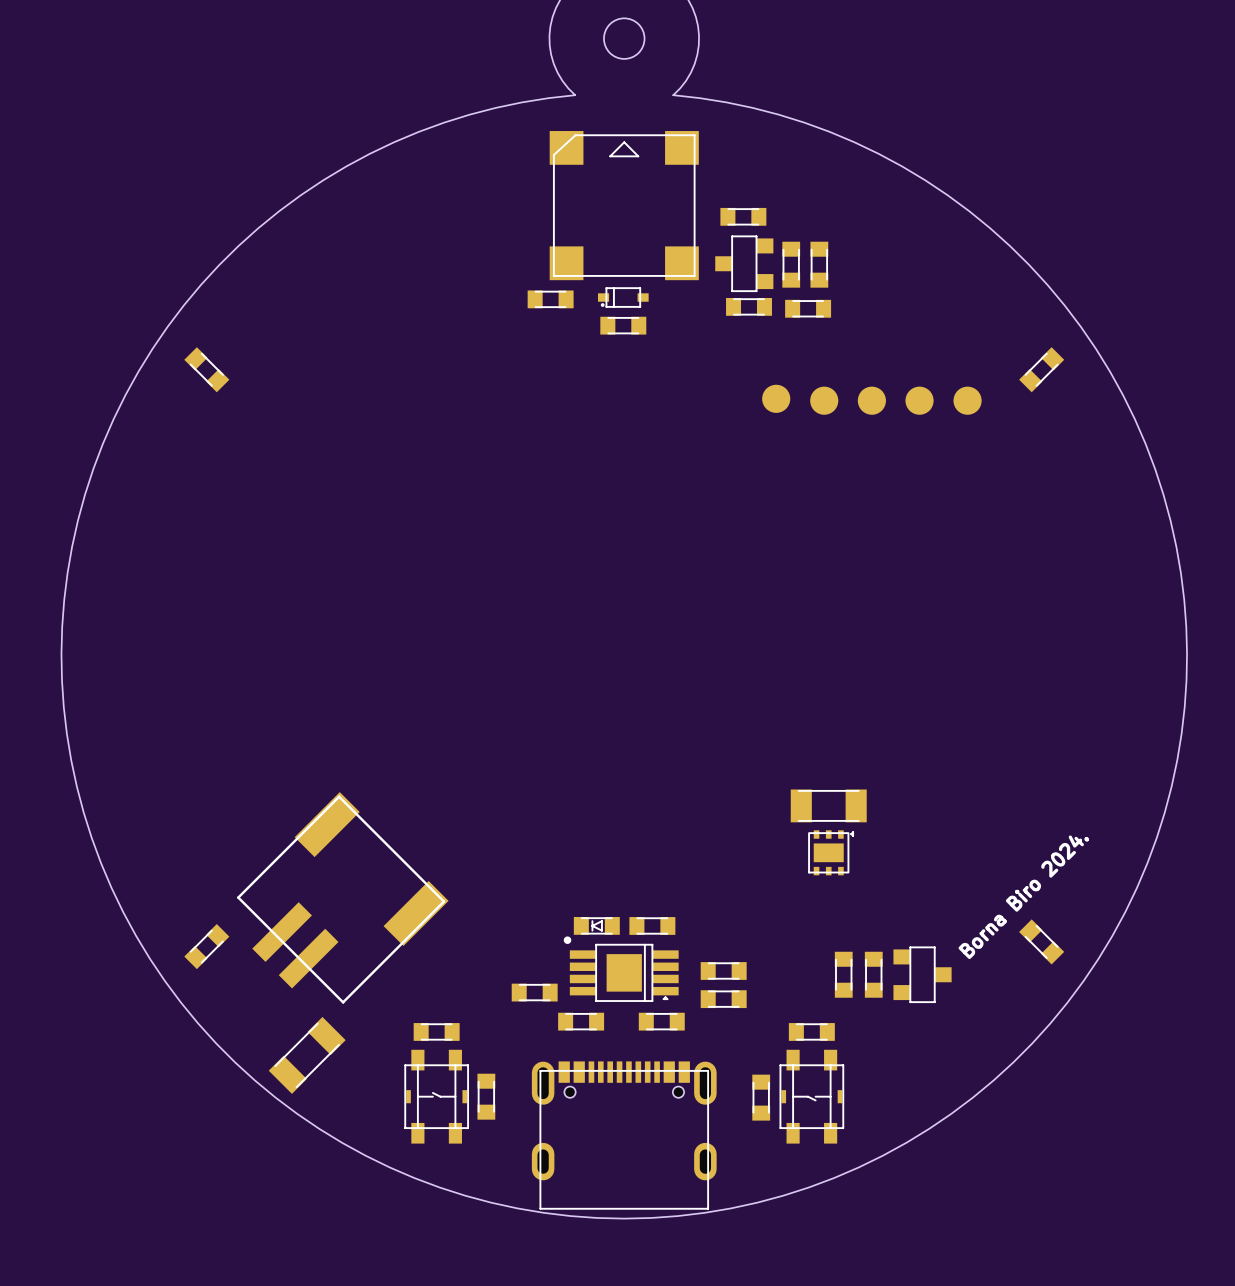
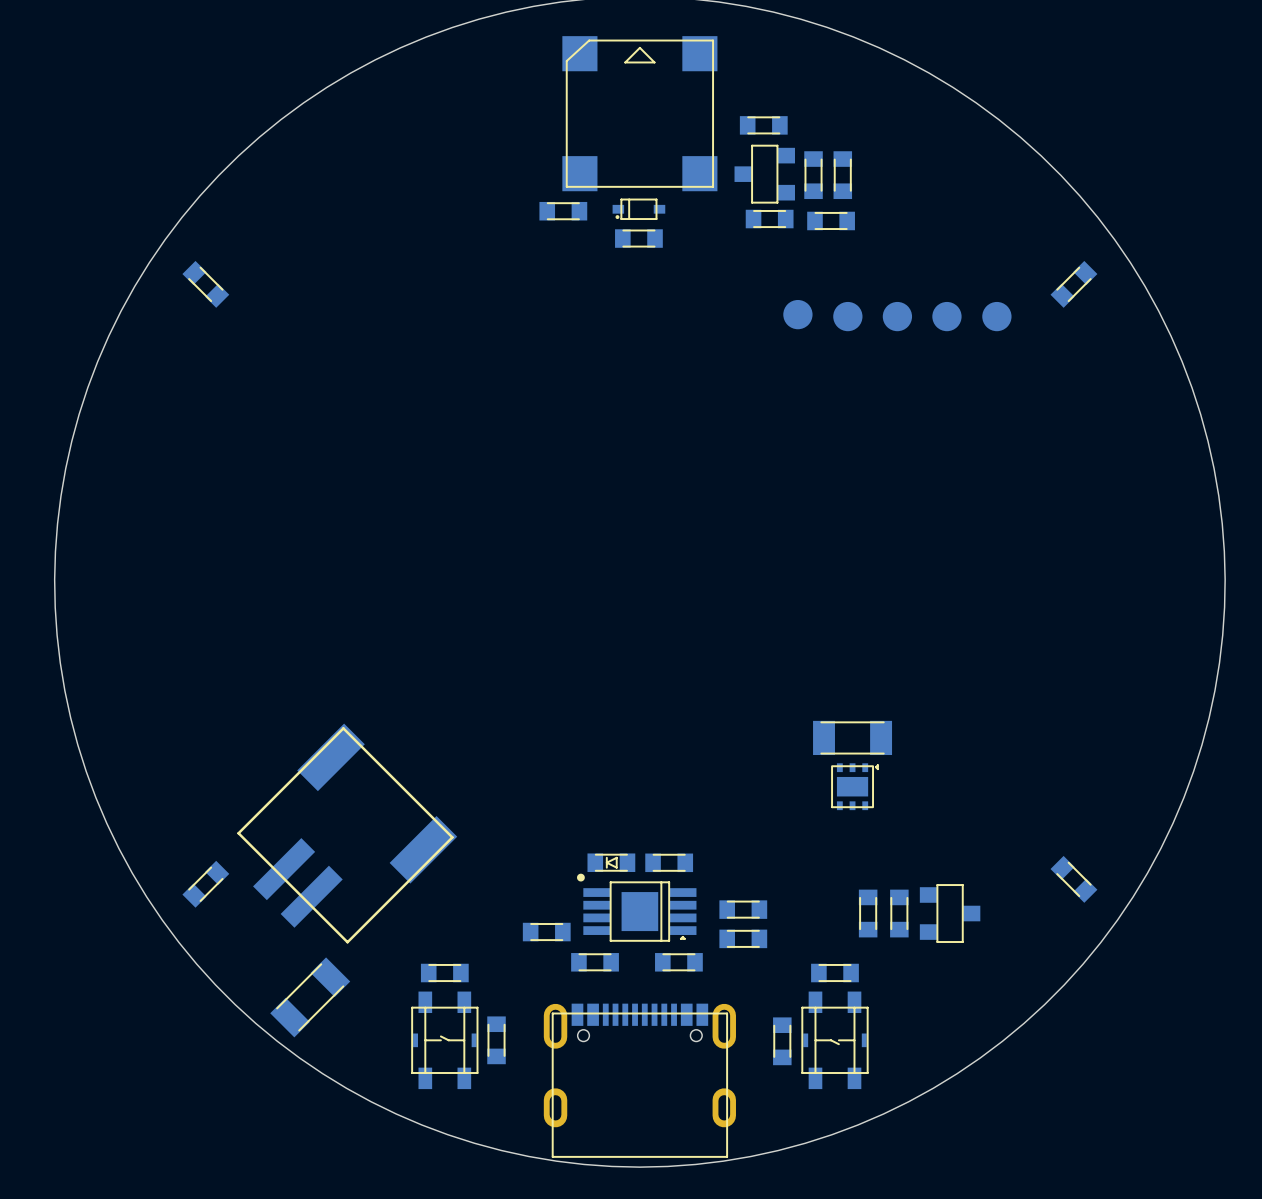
text: Borna Biro 2024. (1023, 897) -> none

